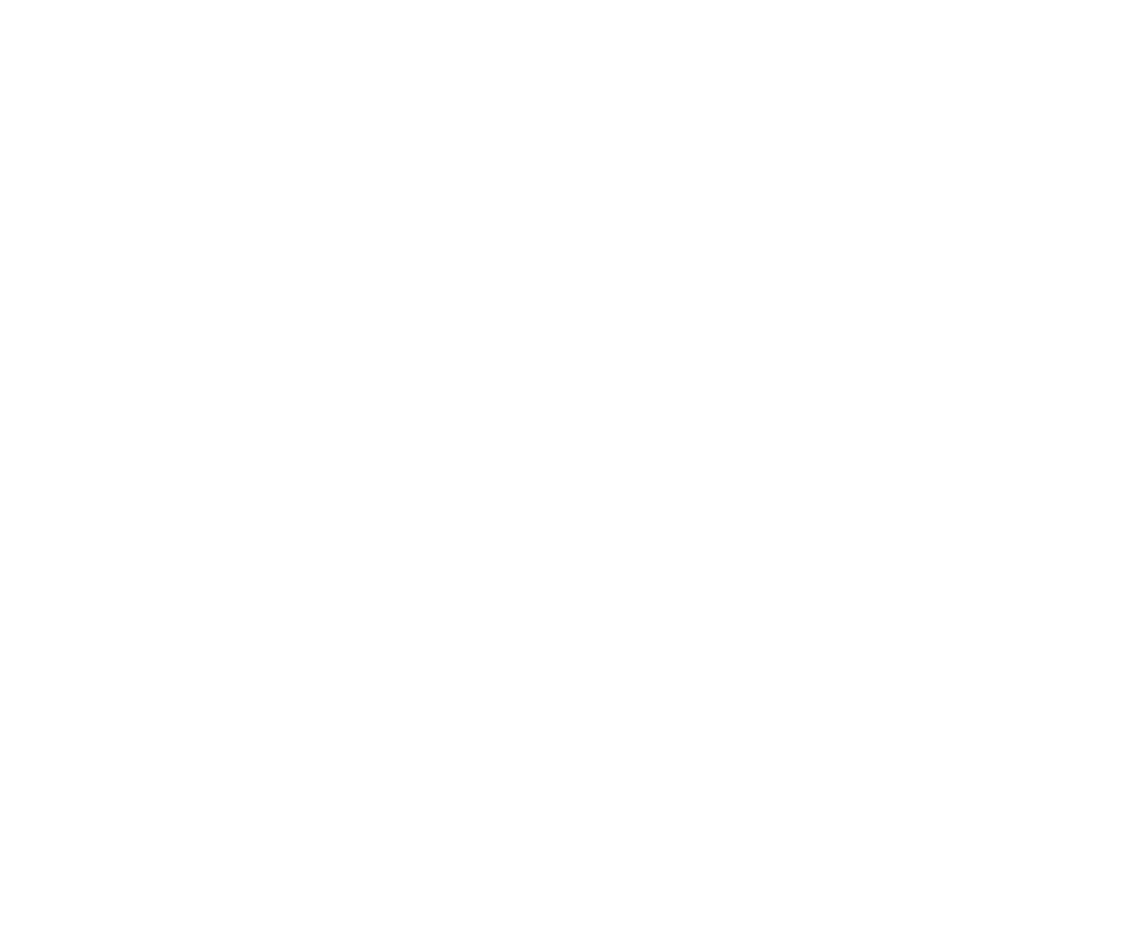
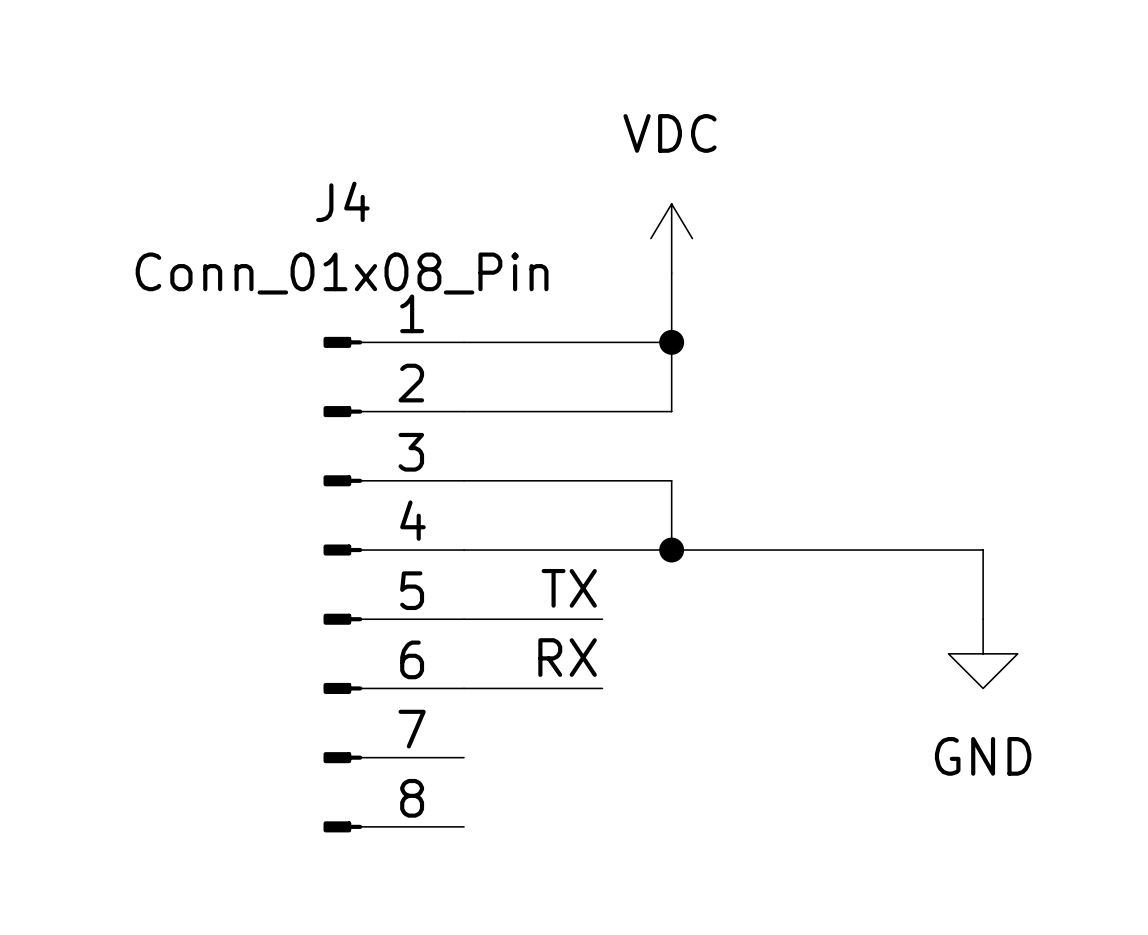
power symbol: none -> VDC (671, 238)
wire: none -> (671, 273) (671, 411) (464, 411)
wire: none -> (464, 342) (671, 342)
junction: none -> (671, 342)
wire: none -> (464, 480) (671, 480) (671, 550)
wire: none -> (464, 550) (983, 550) (983, 619)
junction: none -> (671, 550)
J4: none -> Conn_01x08_Pin (393, 584)
label: none -> TX (569, 588)
wire: none -> (464, 619) (602, 619)
power symbol: none -> GND (983, 653)
label: none -> RX (567, 657)
wire: none -> (464, 688) (602, 688)

